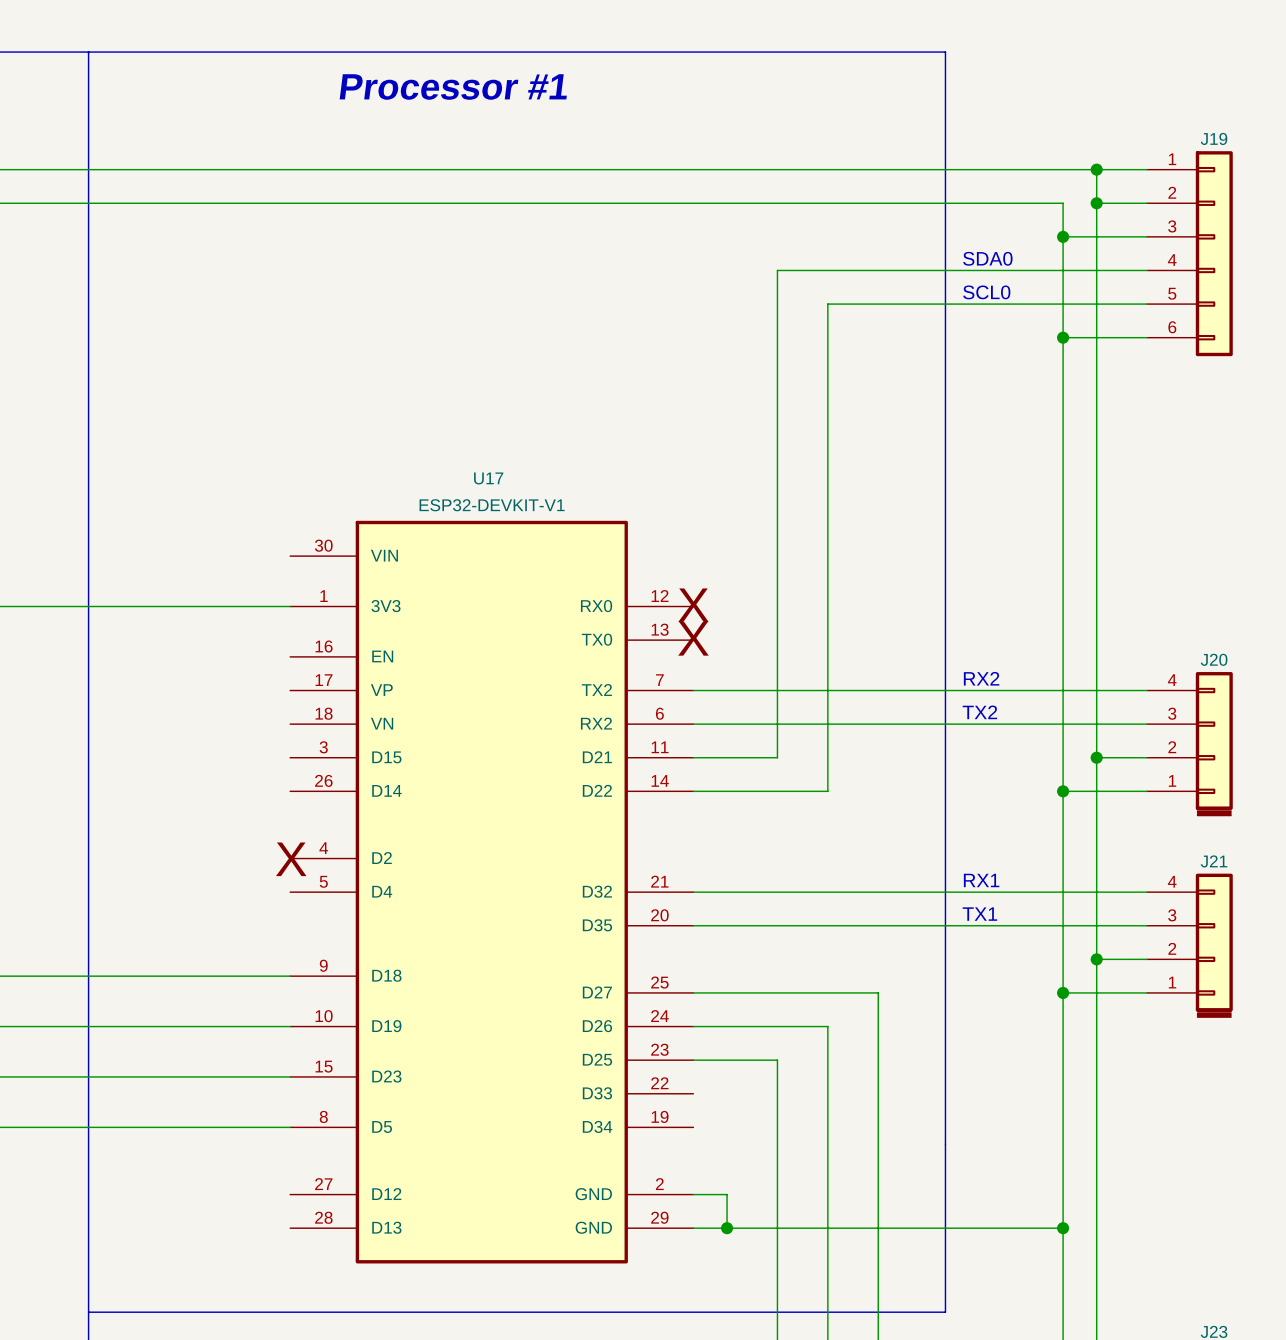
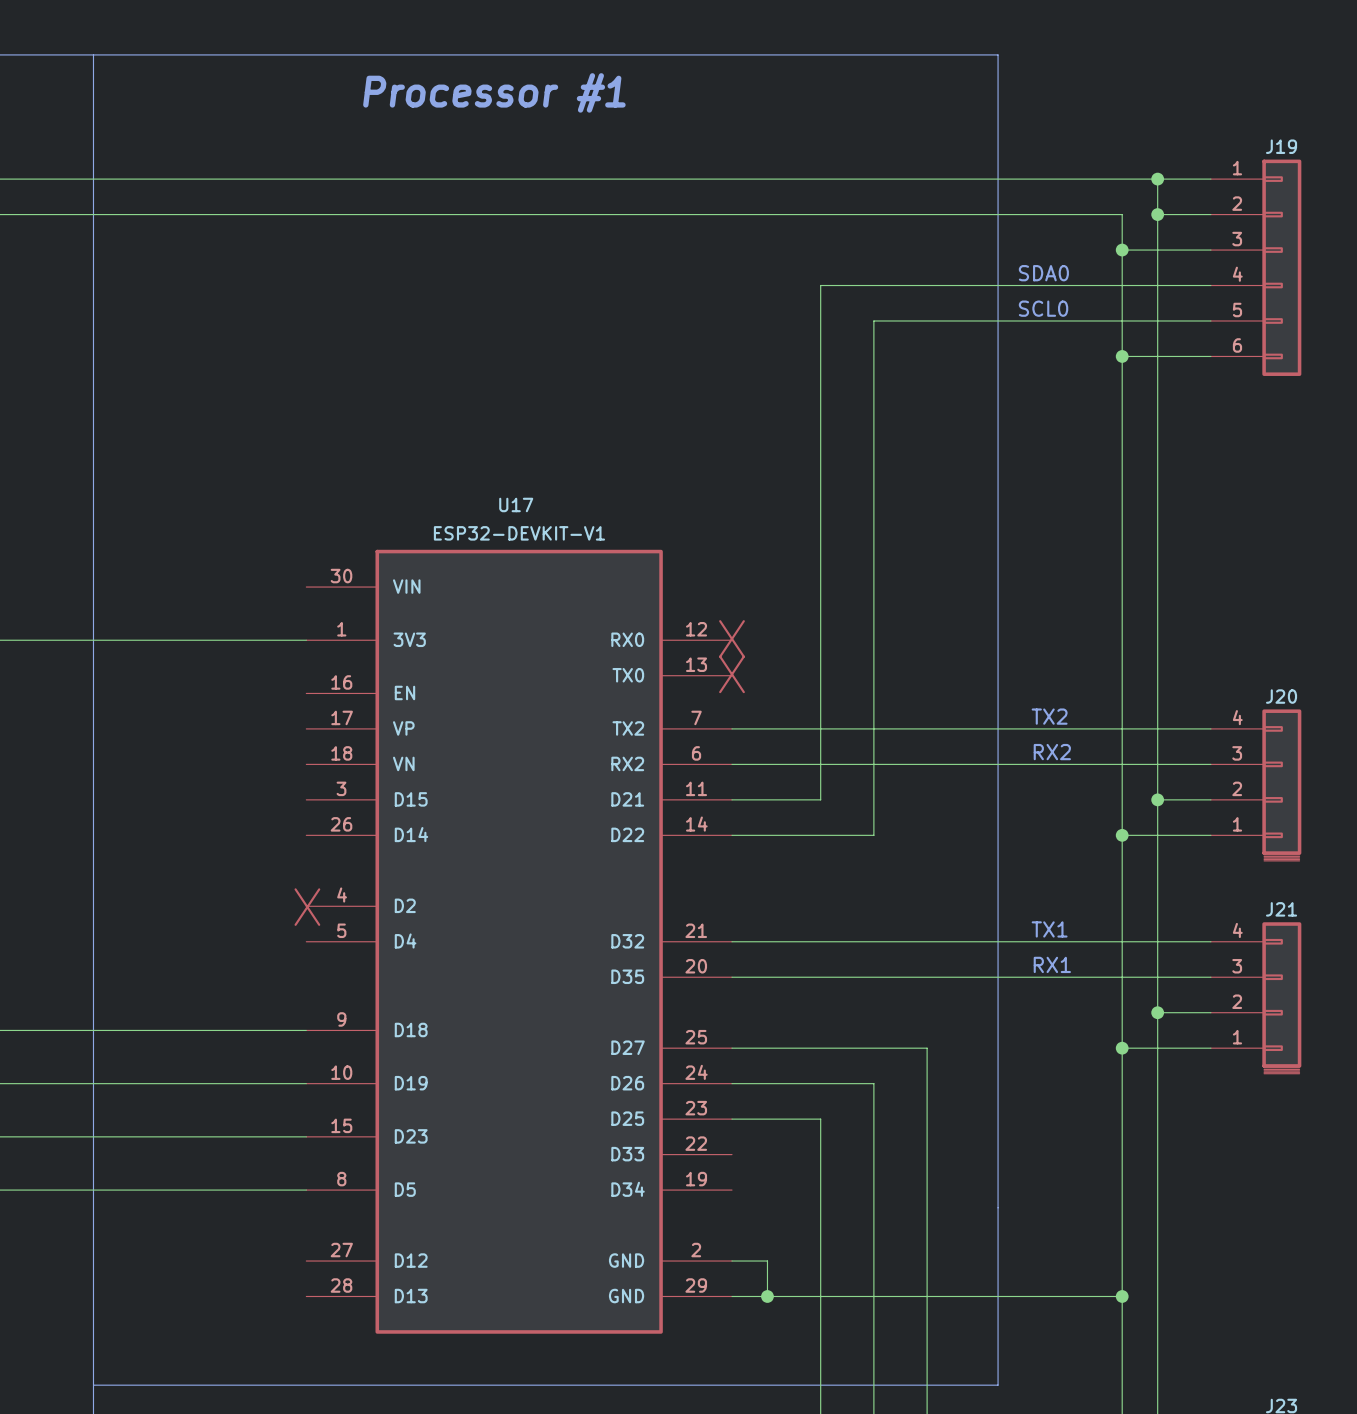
text position: RX2 (981, 678) -> RX2 (1052, 752)
text position: TX2 (979, 712) -> TX2 (1049, 716)
text position: RX1 (981, 880) -> RX1 (1052, 964)
text position: TX1 (979, 914) -> TX1 (1049, 929)

